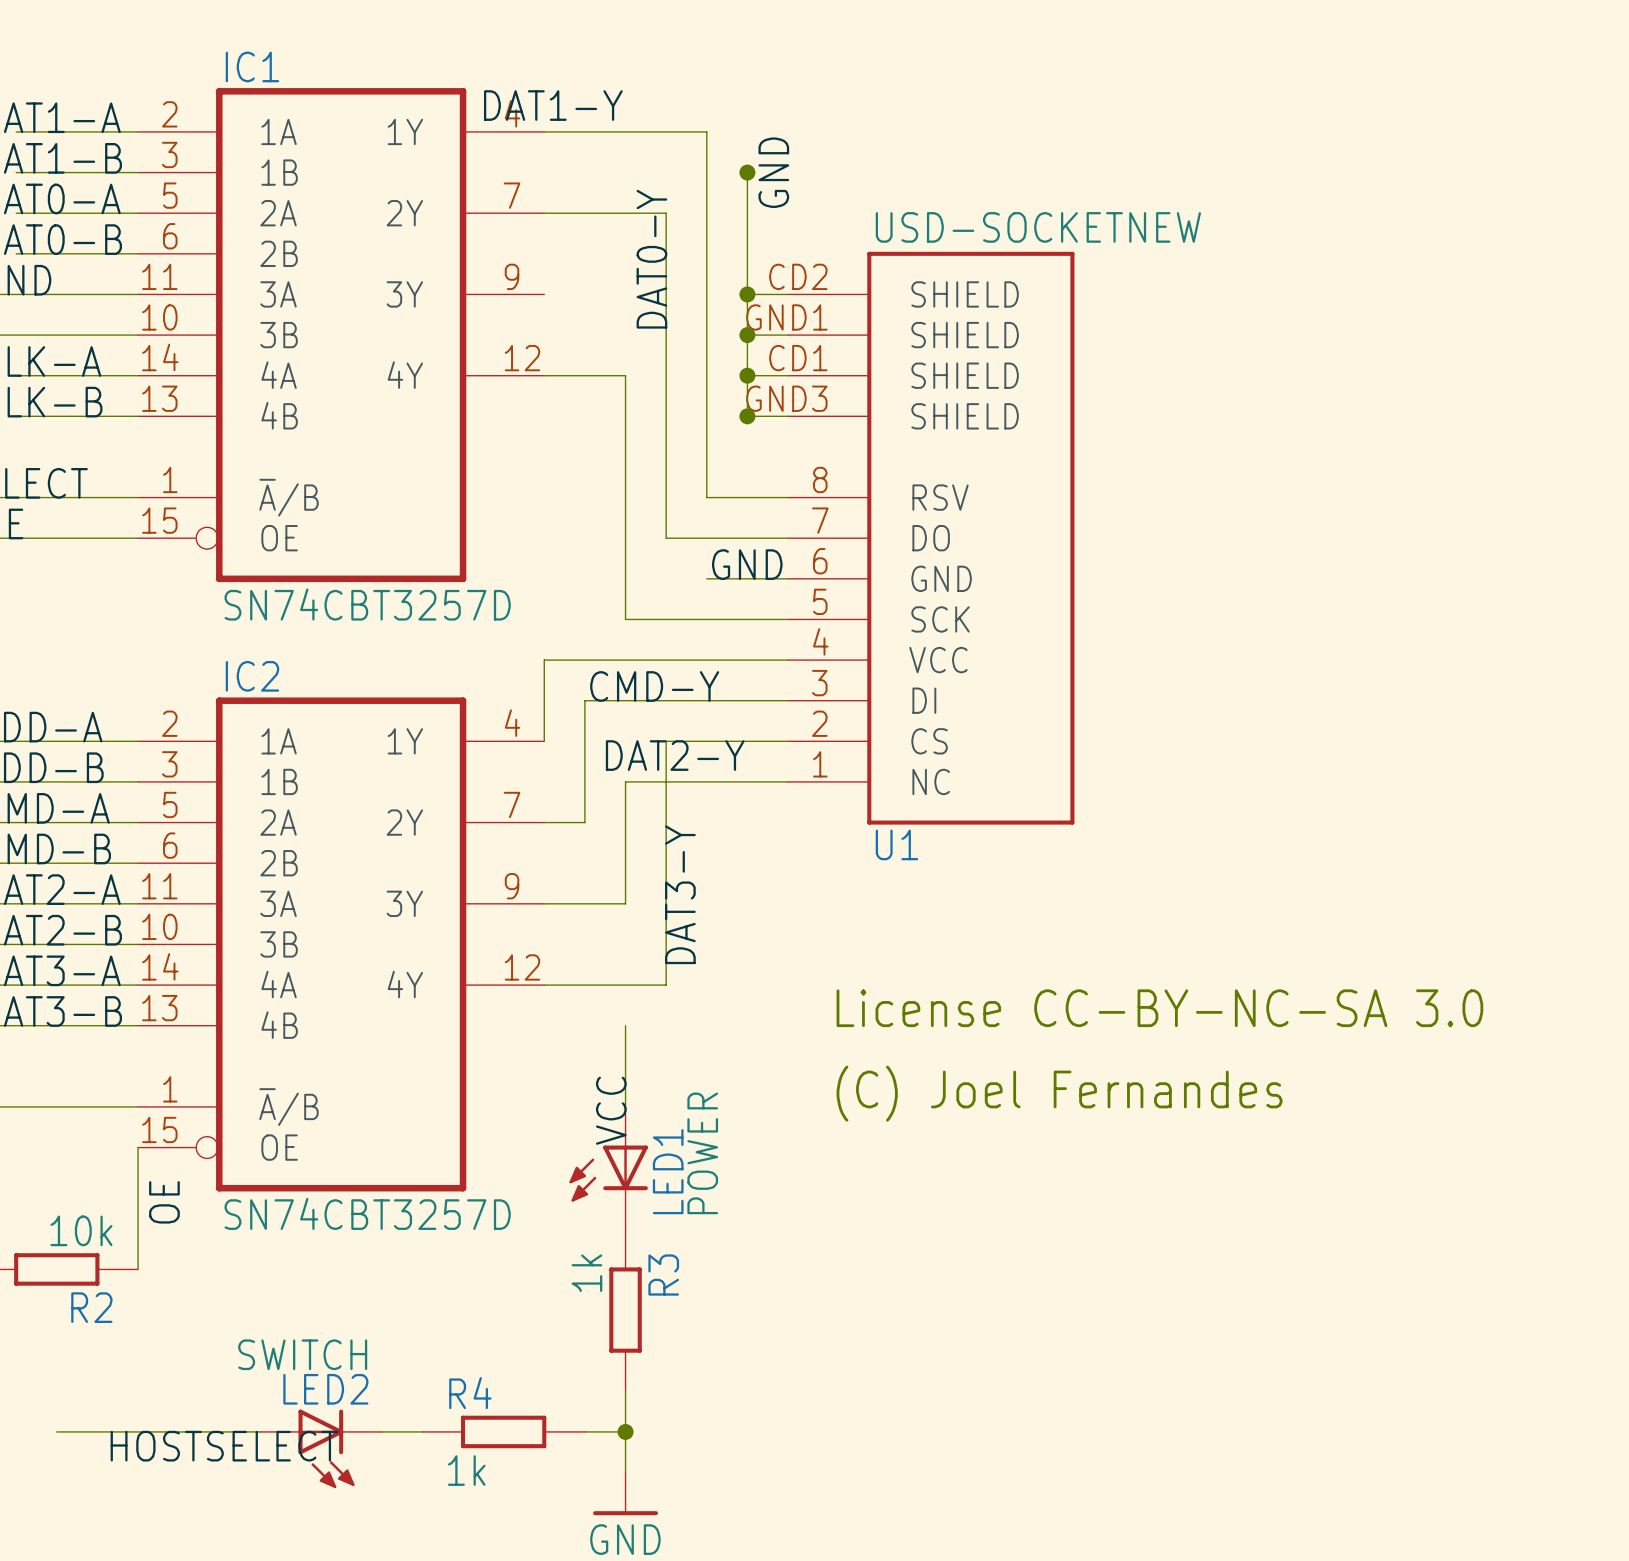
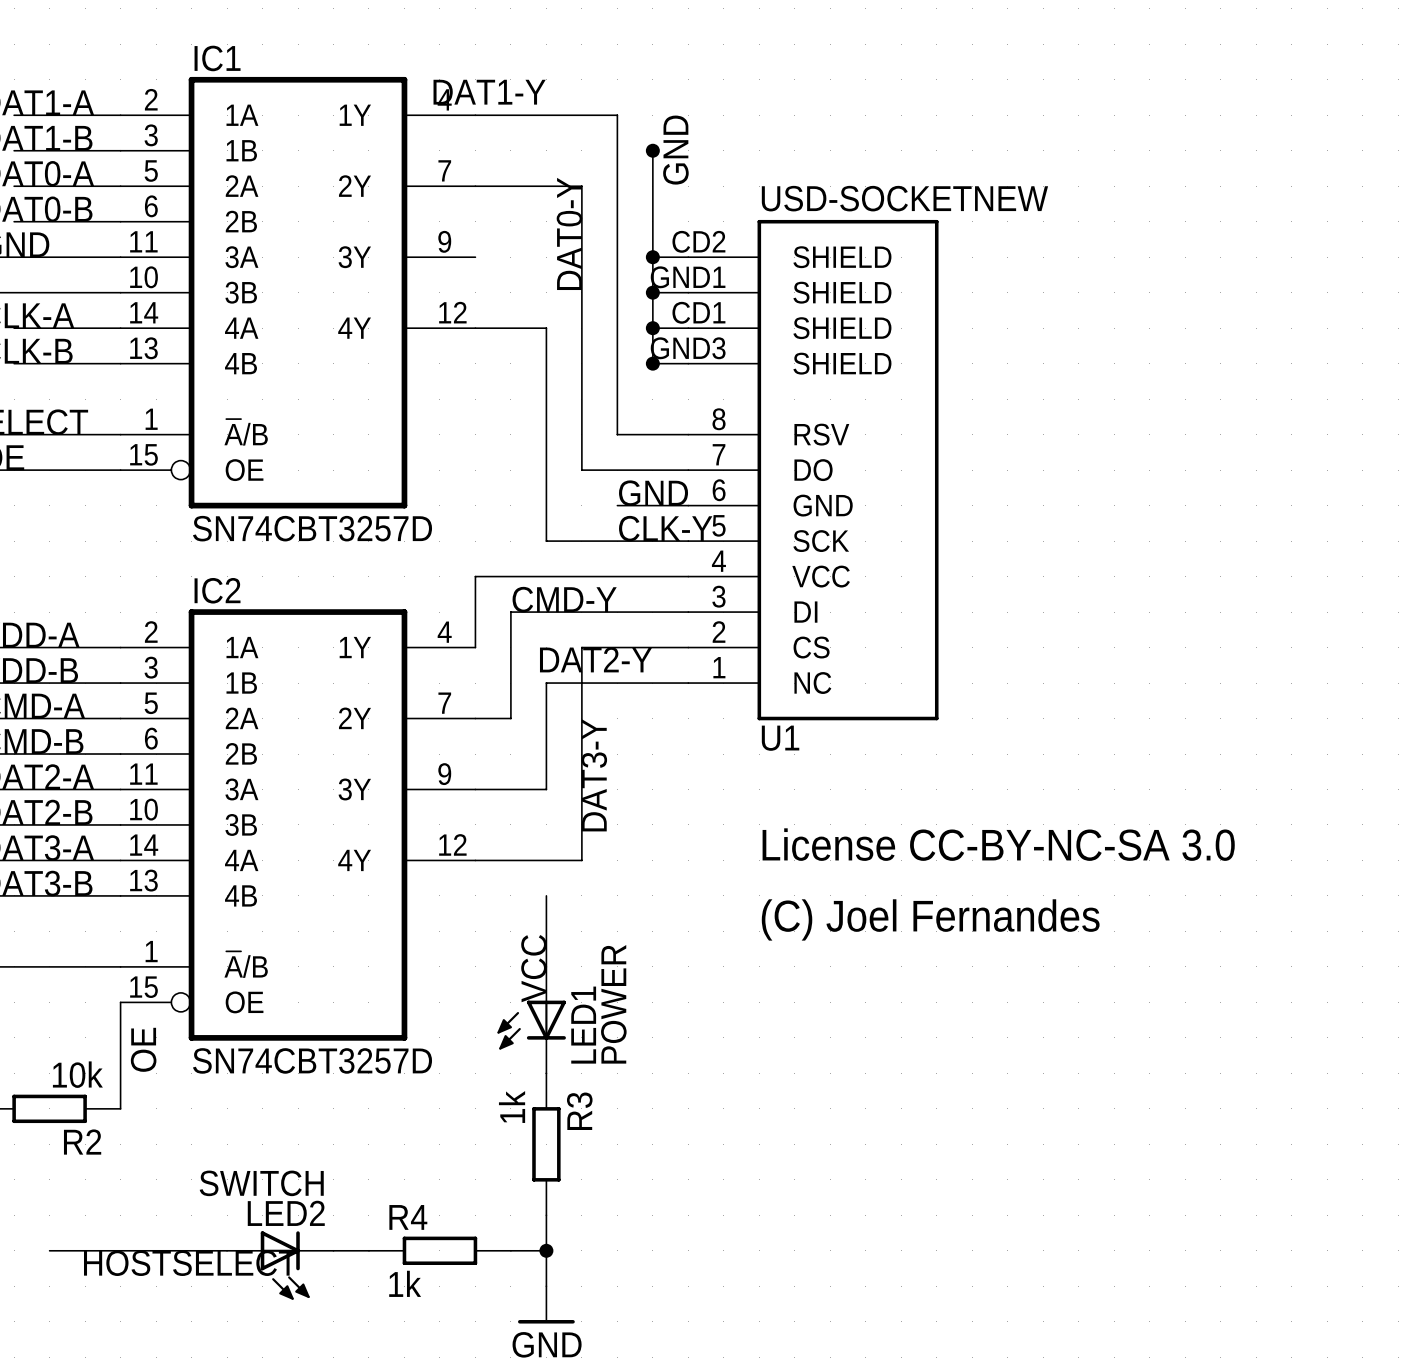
label: none -> CLK-Y (665, 528)
text position: License CC-BY-NC-SA 3.0 (1159, 1008) -> License CC-BY-NC-SA 3.0 (998, 844)
text position: (C) Joel Fernandes (1059, 1093) -> (C) Joel Fernandes (930, 919)

